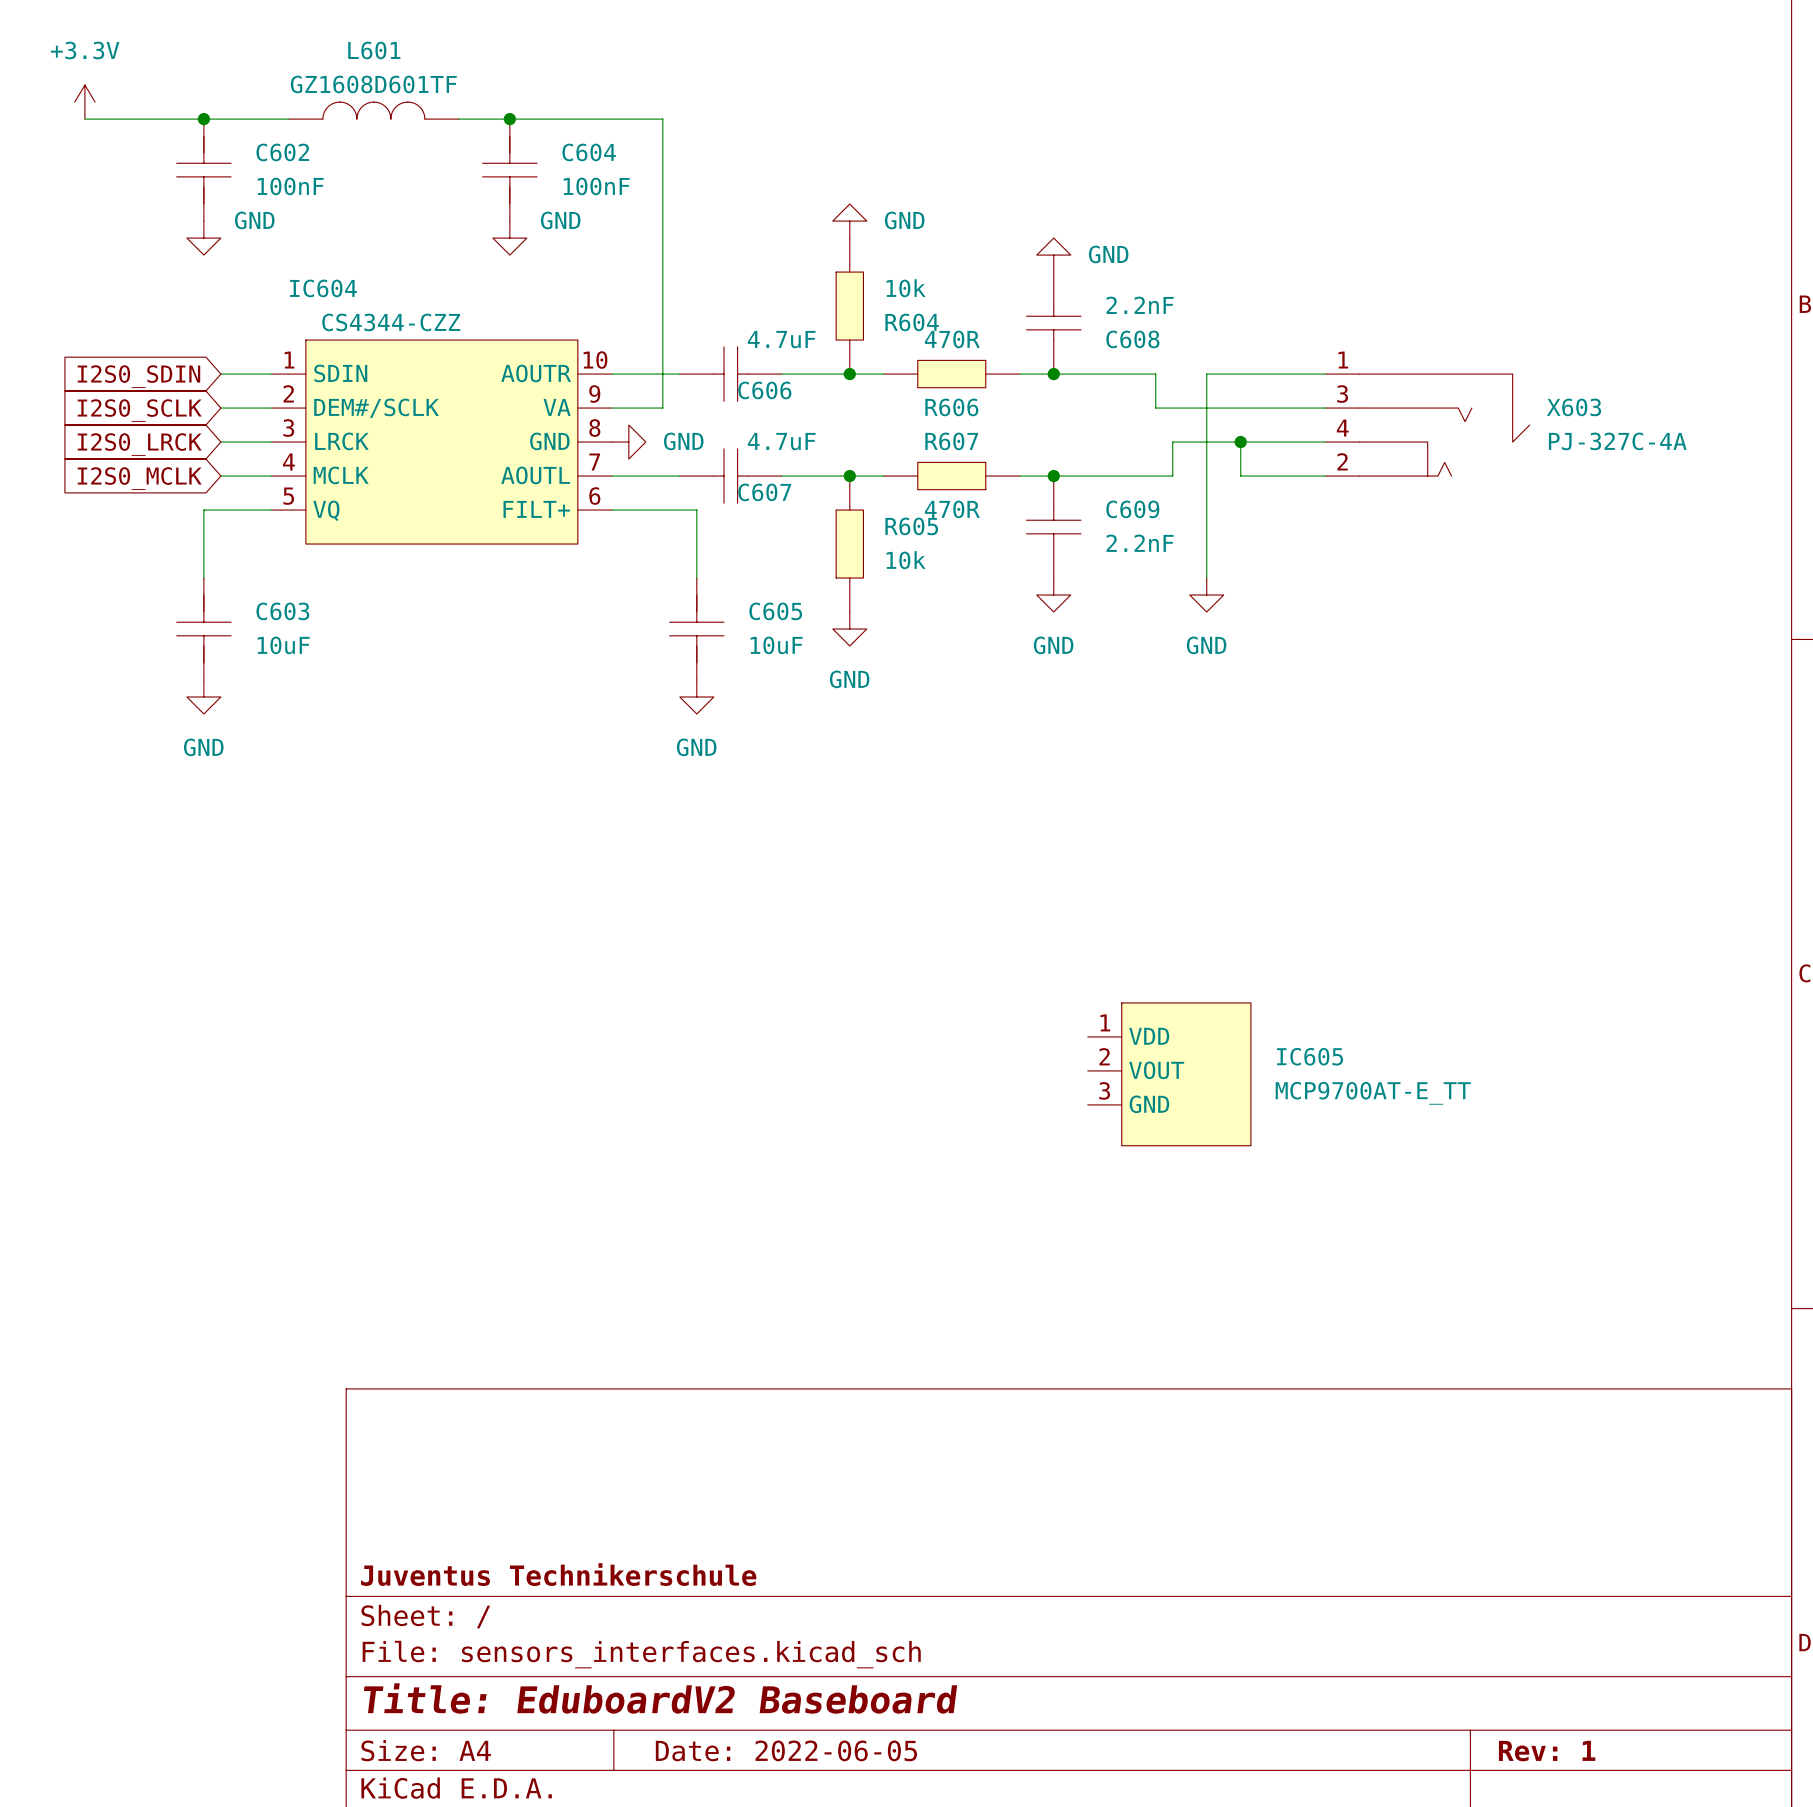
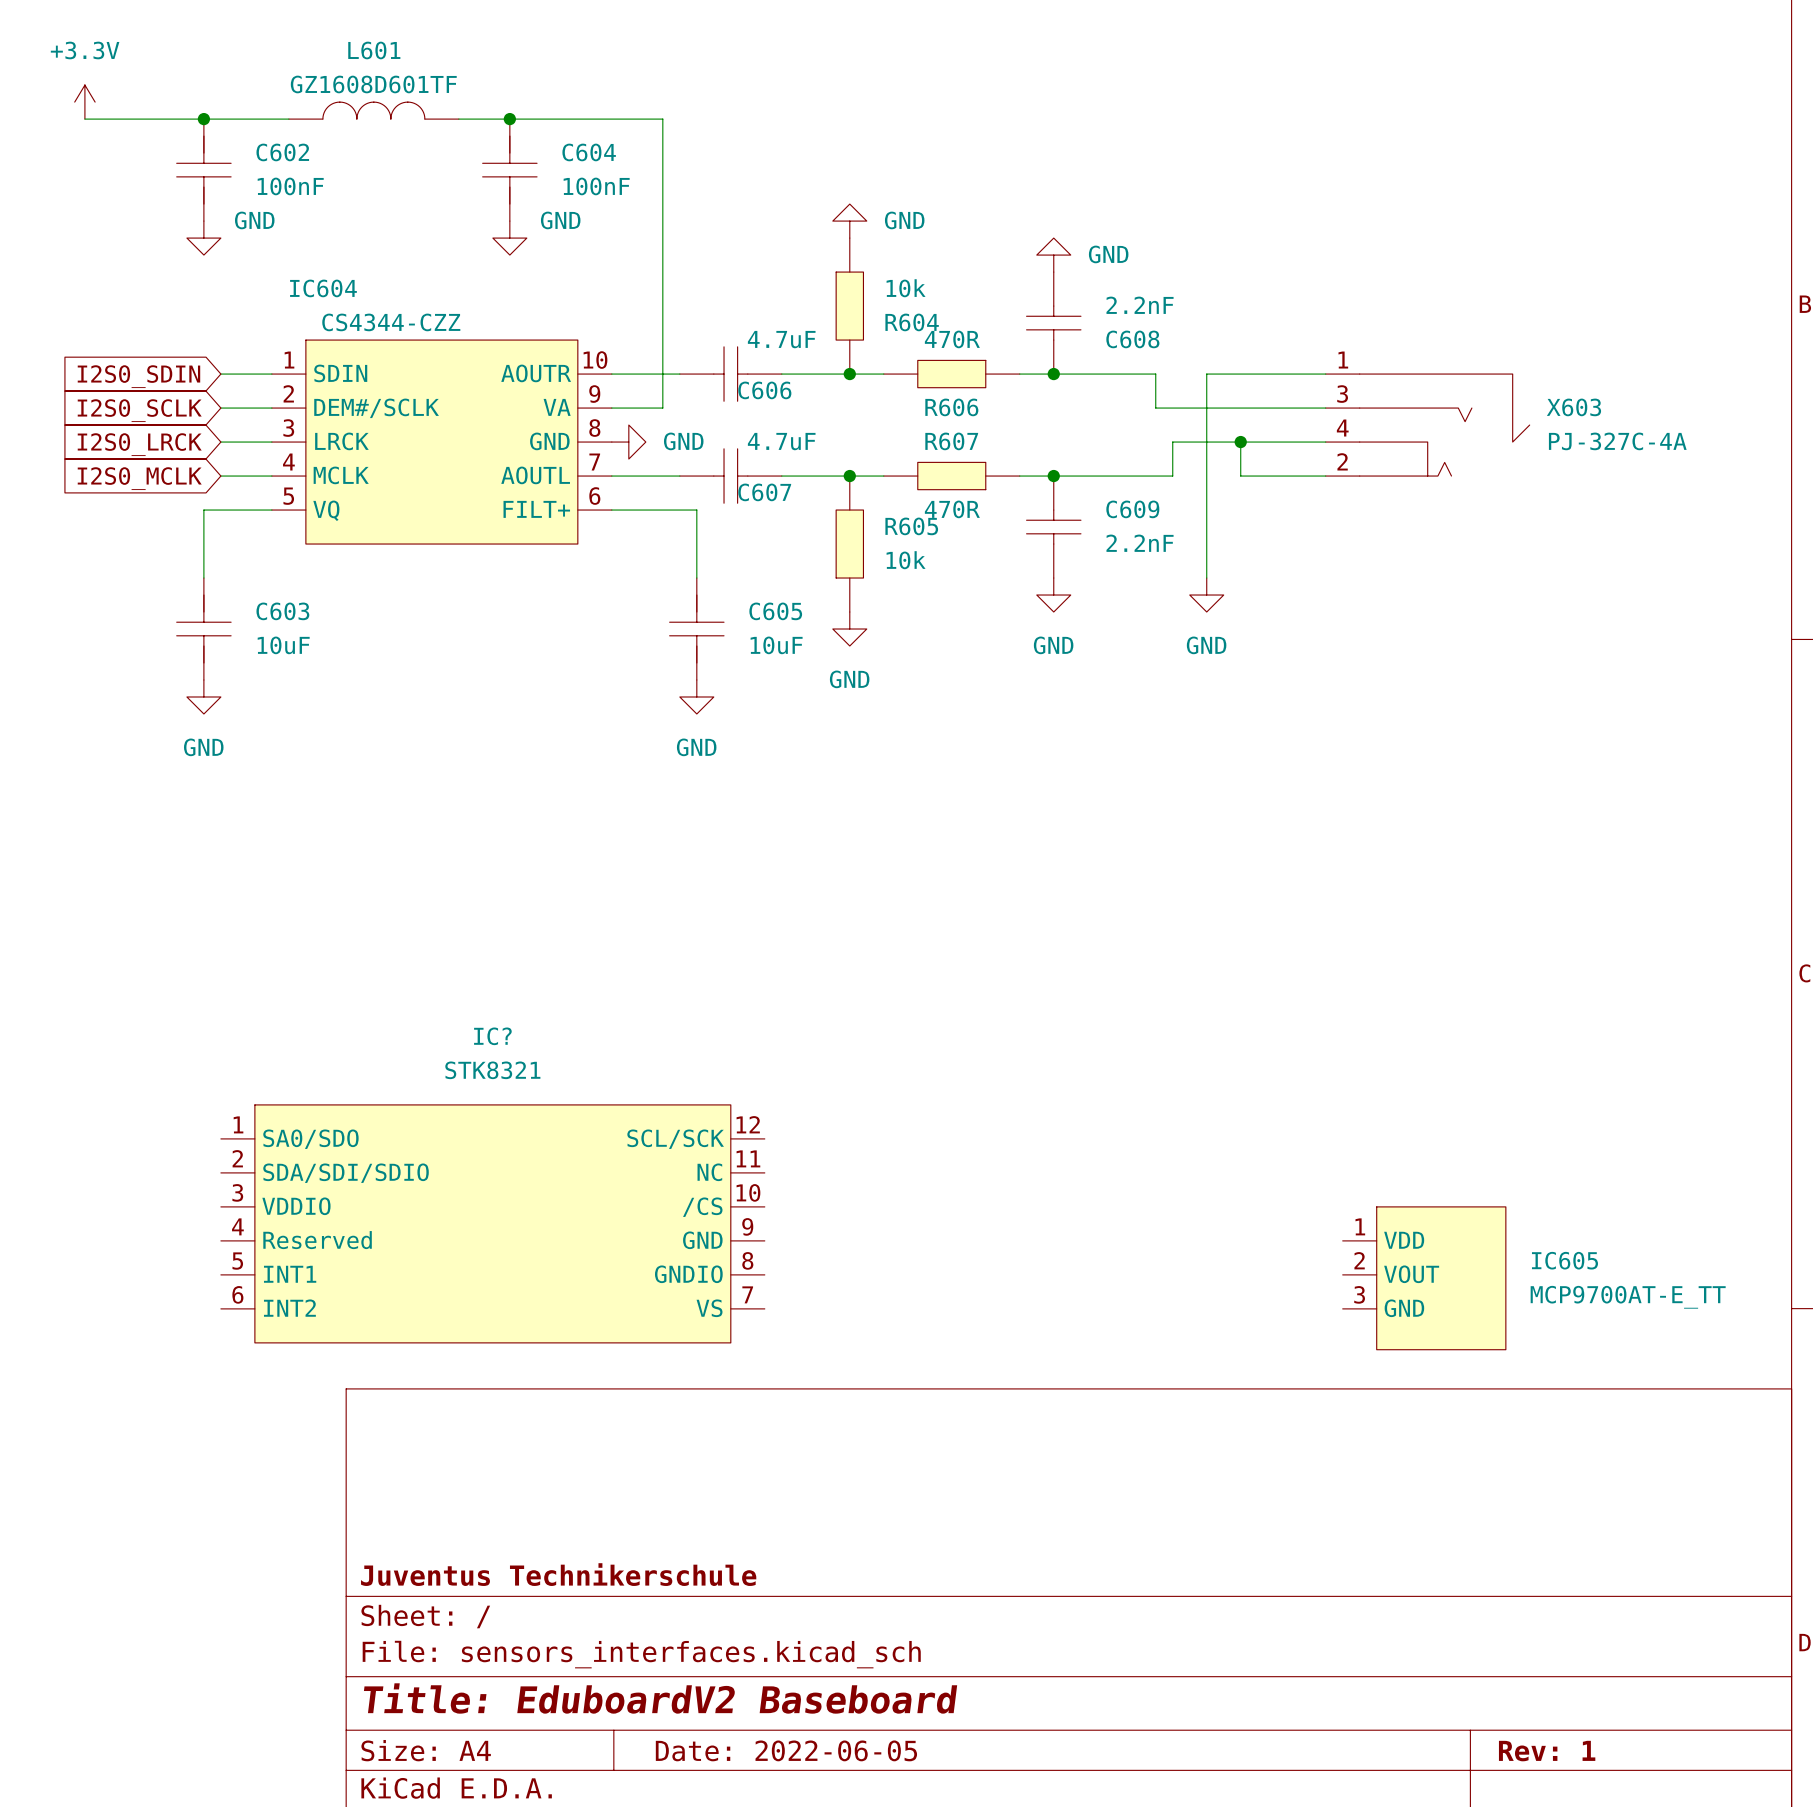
IC605 position: (1169, 1074) -> (1424, 1278)
IC?: none -> STK8321 (492, 1223)

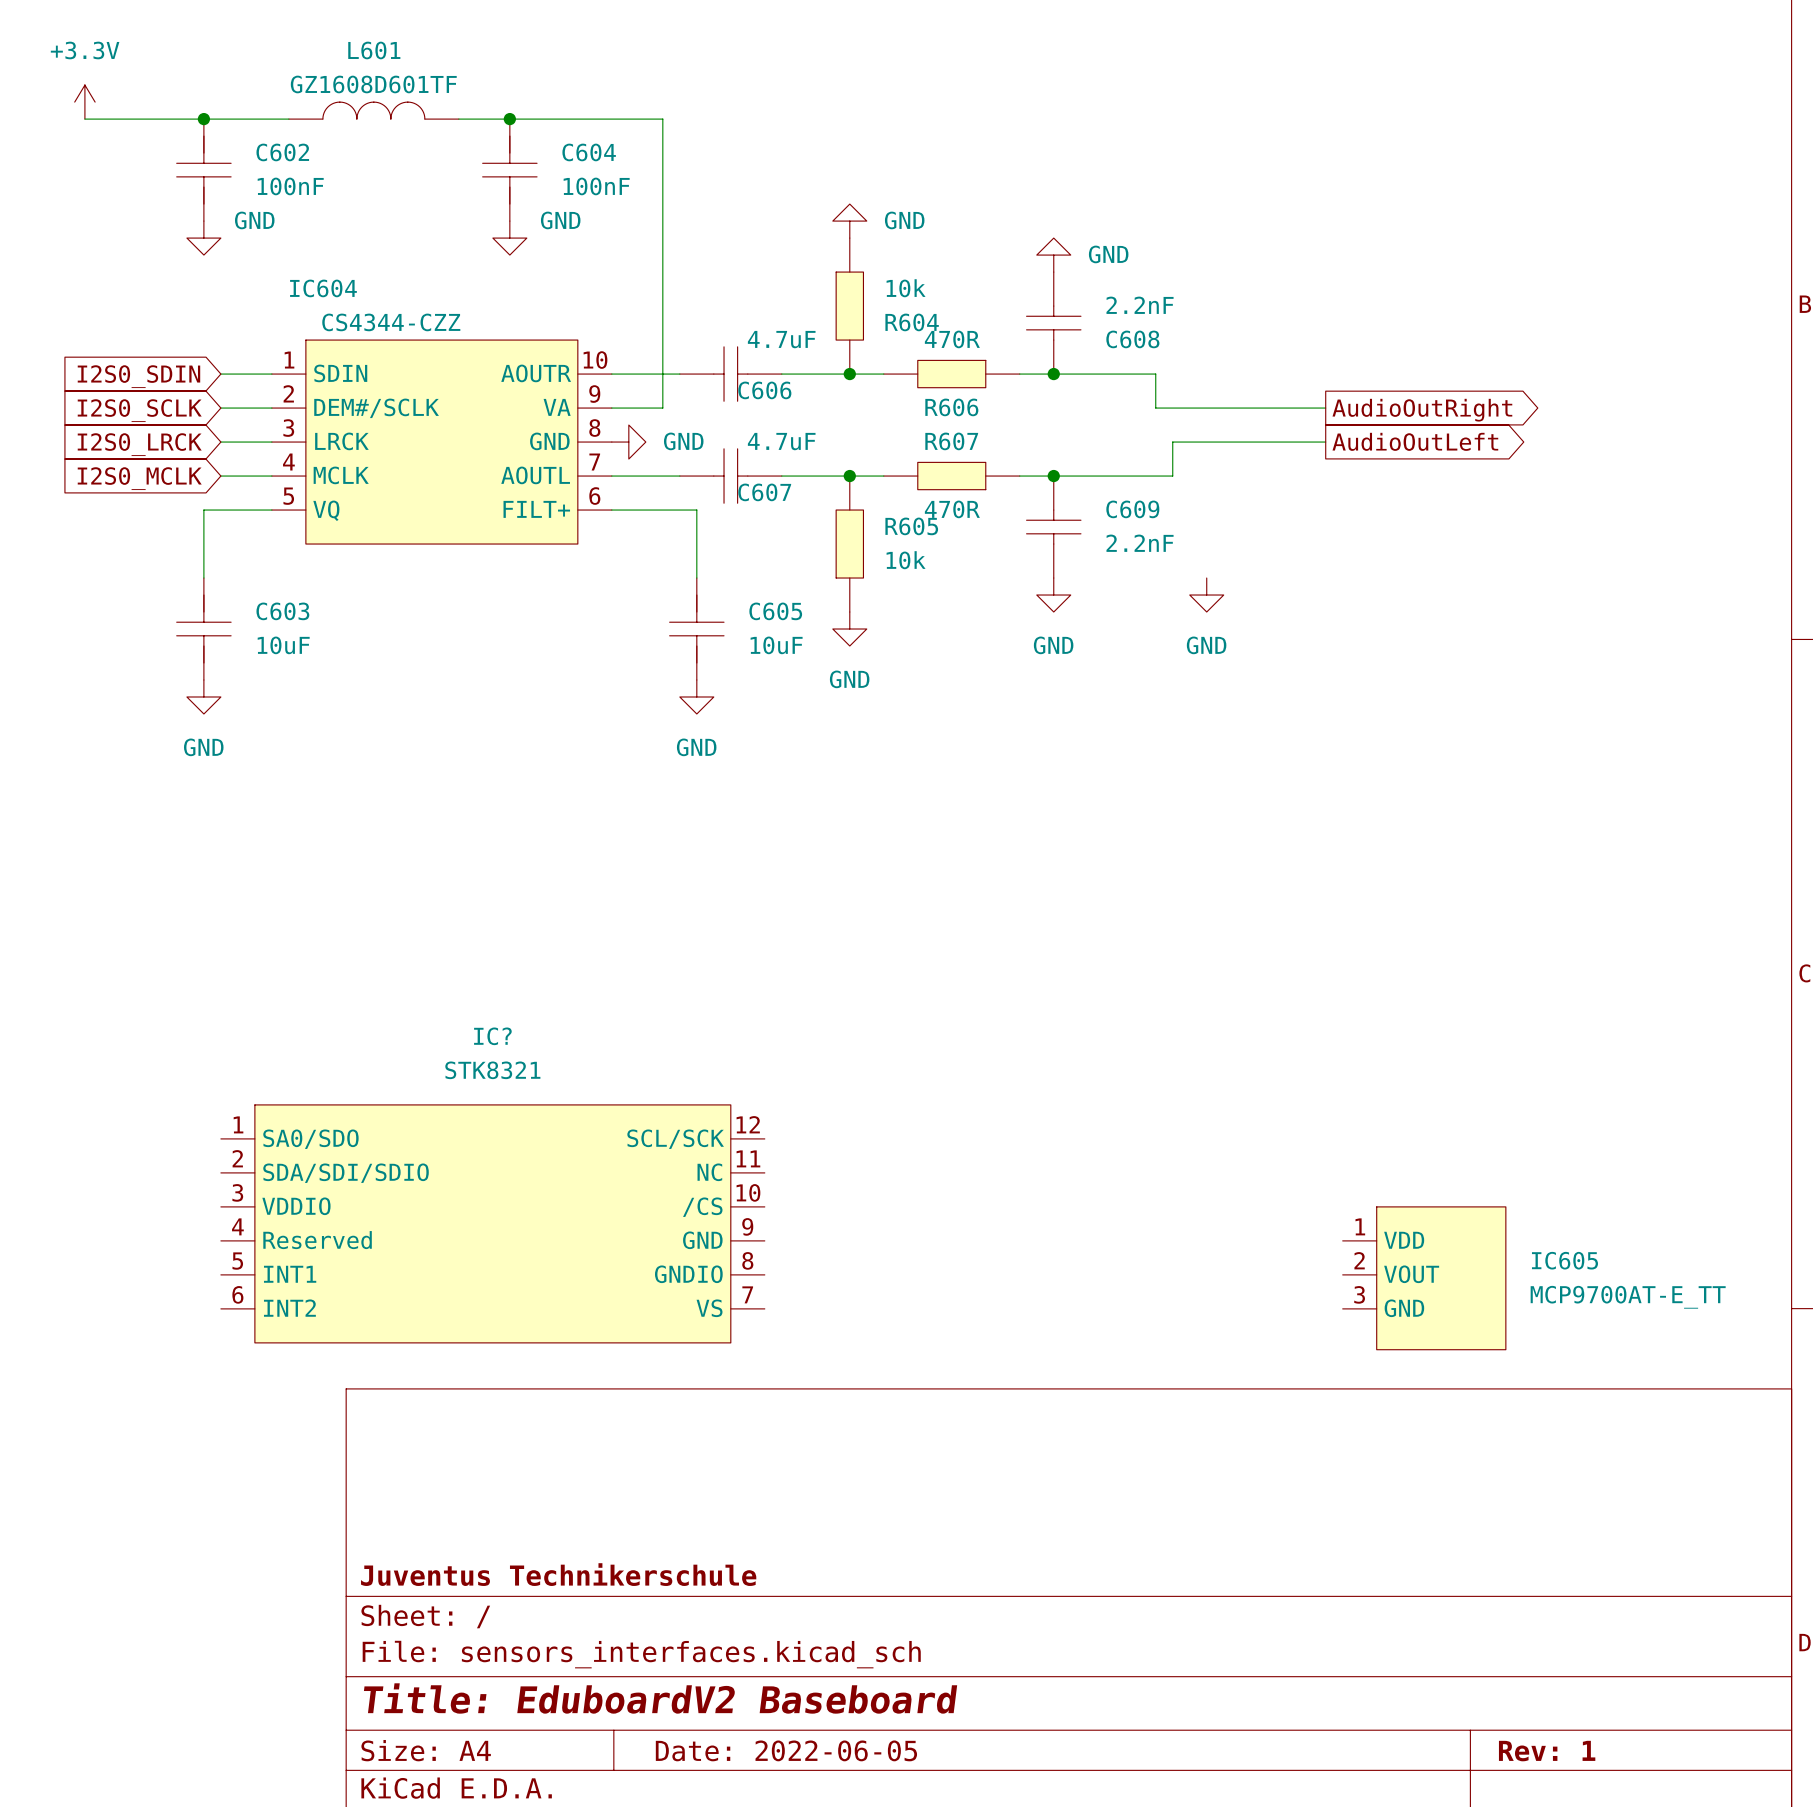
wire: (1325, 374) (1206, 374) (1206, 578) -> none
global label: none -> AudioOutRight (1422, 410)
X603: PJ-327C-4A (1427, 425) -> none
global label: none -> AudioOutLeft (1415, 441)
wire: (1240, 442) (1240, 476) (1325, 476) -> none
junction: (1240, 442) -> none

